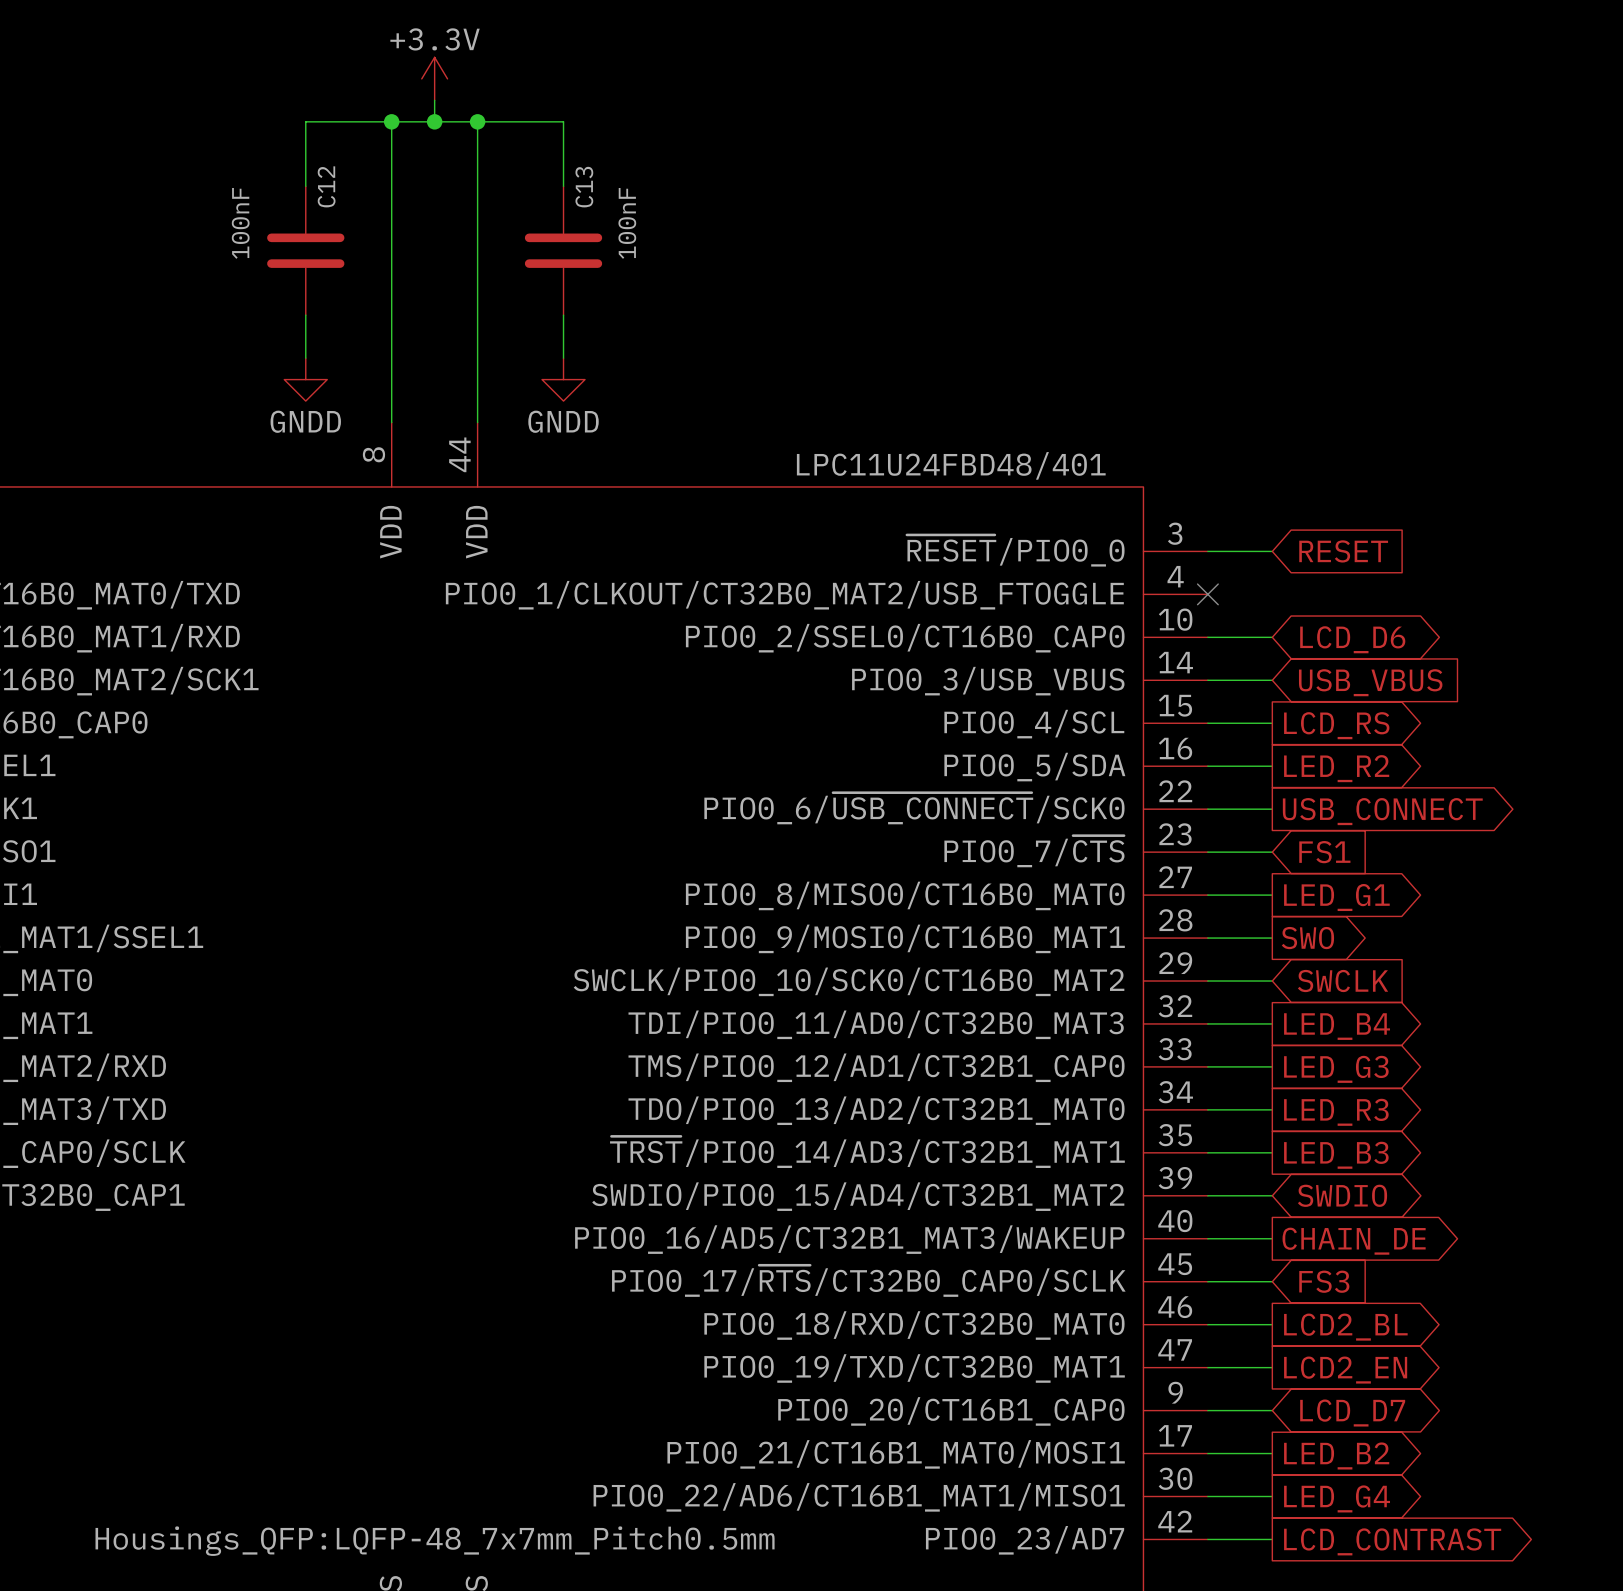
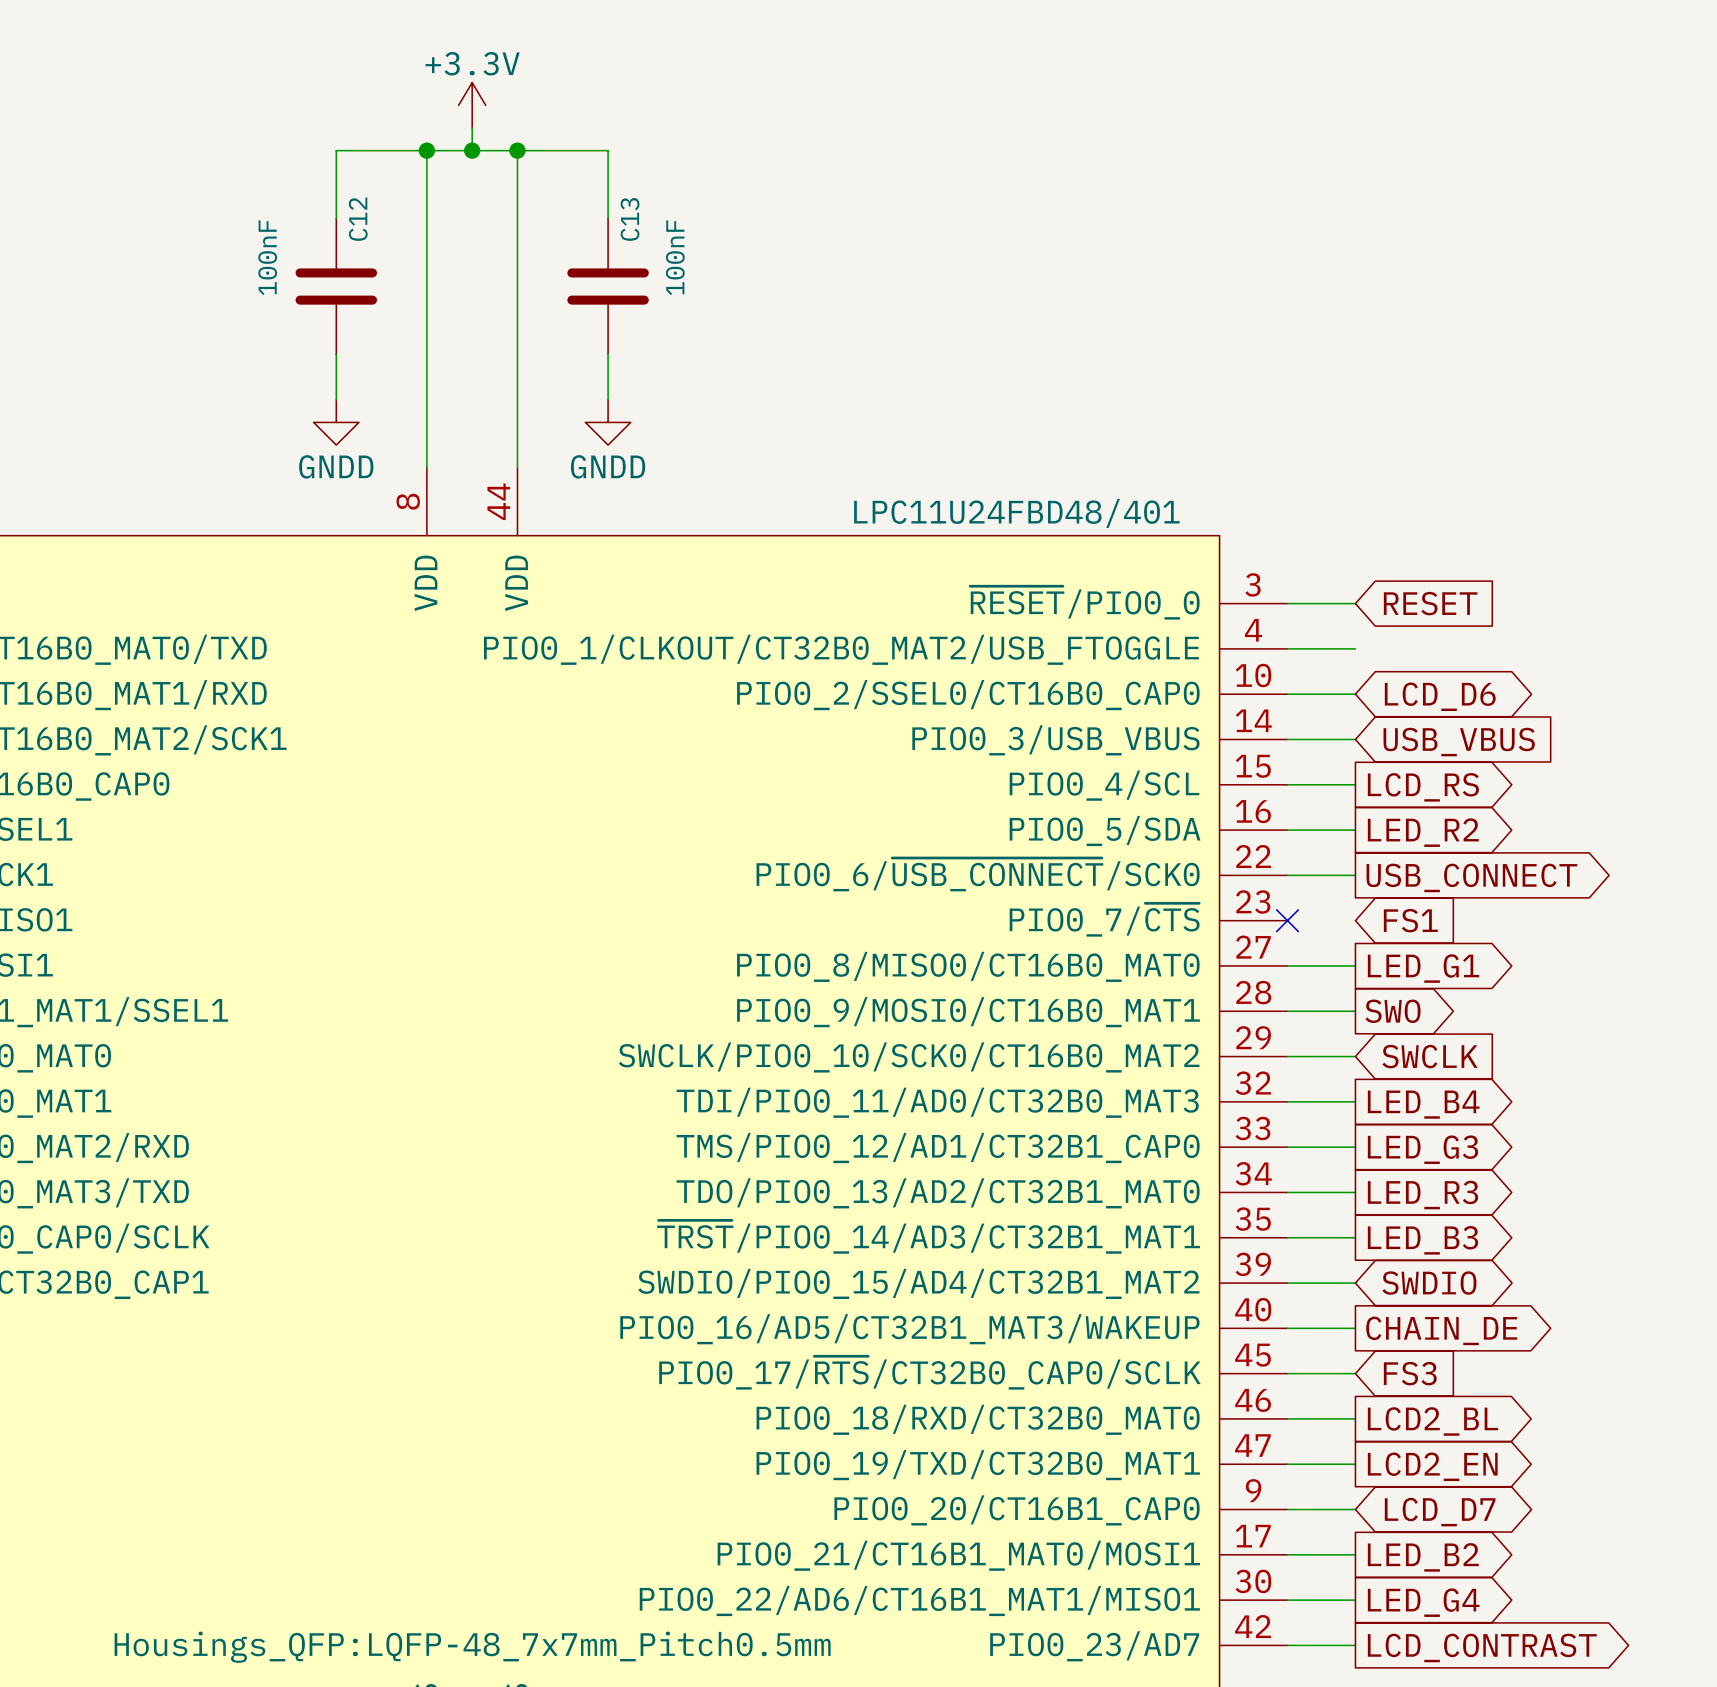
no-connect mark: (1207, 594) -> none
wire: (1207, 852) (1272, 852) -> (1287, 648) (1355, 648)
no-connect mark: none -> (1287, 920)

